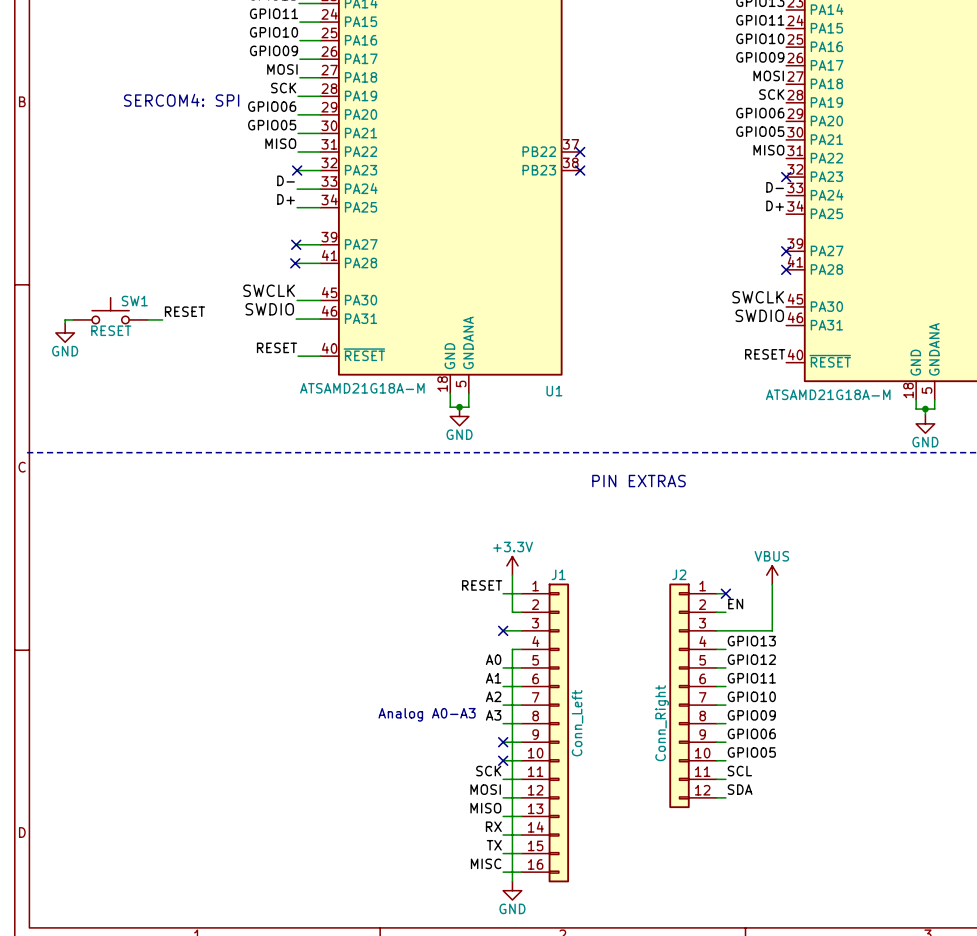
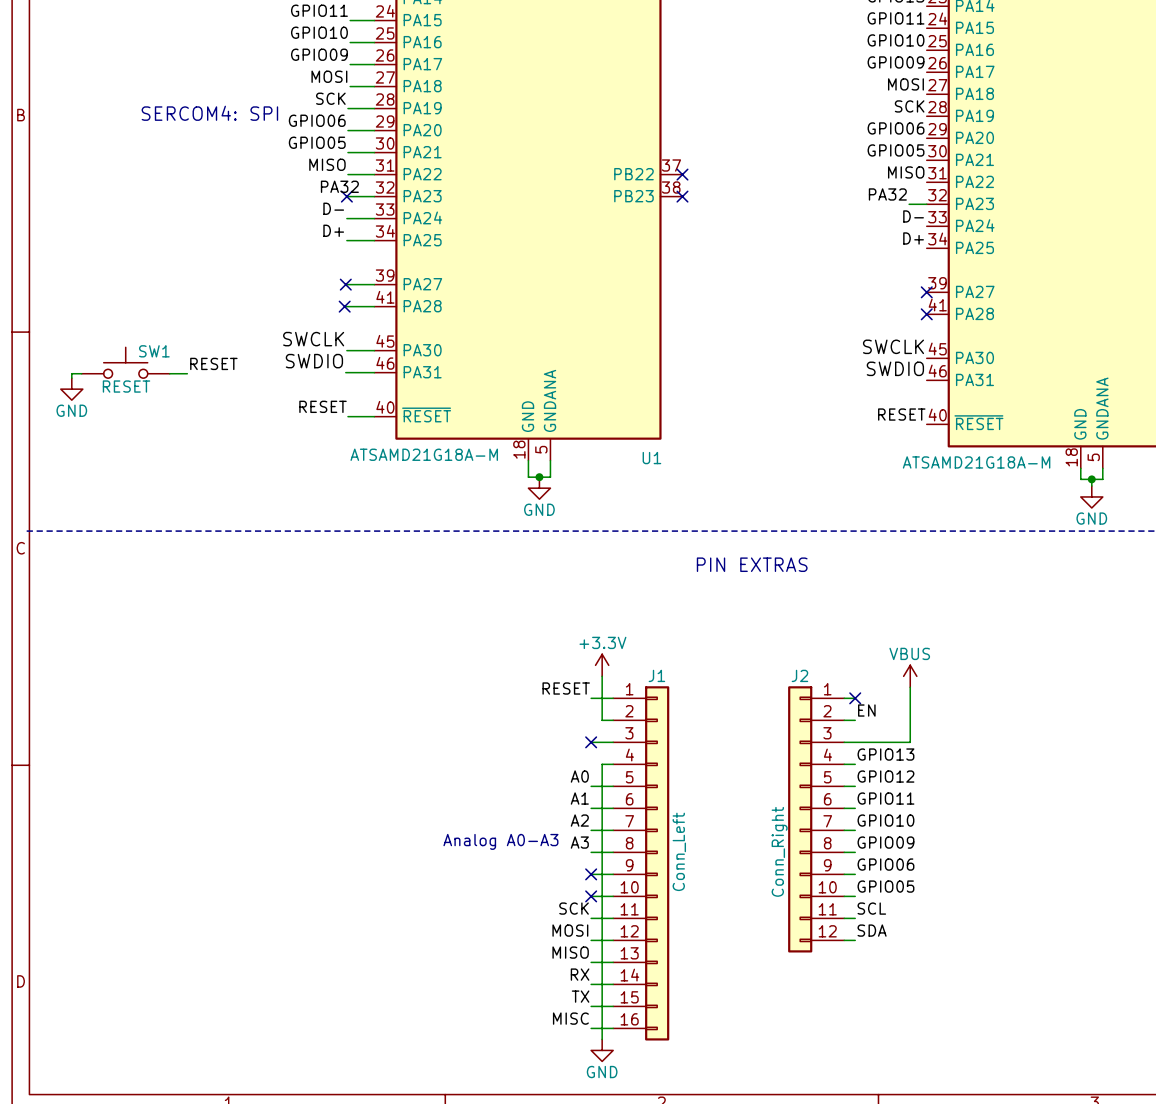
label: none -> PA32 (339, 186)
label: none -> PA32 (887, 194)
wire: none -> (909, 204) (926, 204)
no-connect mark: (786, 177) -> none

